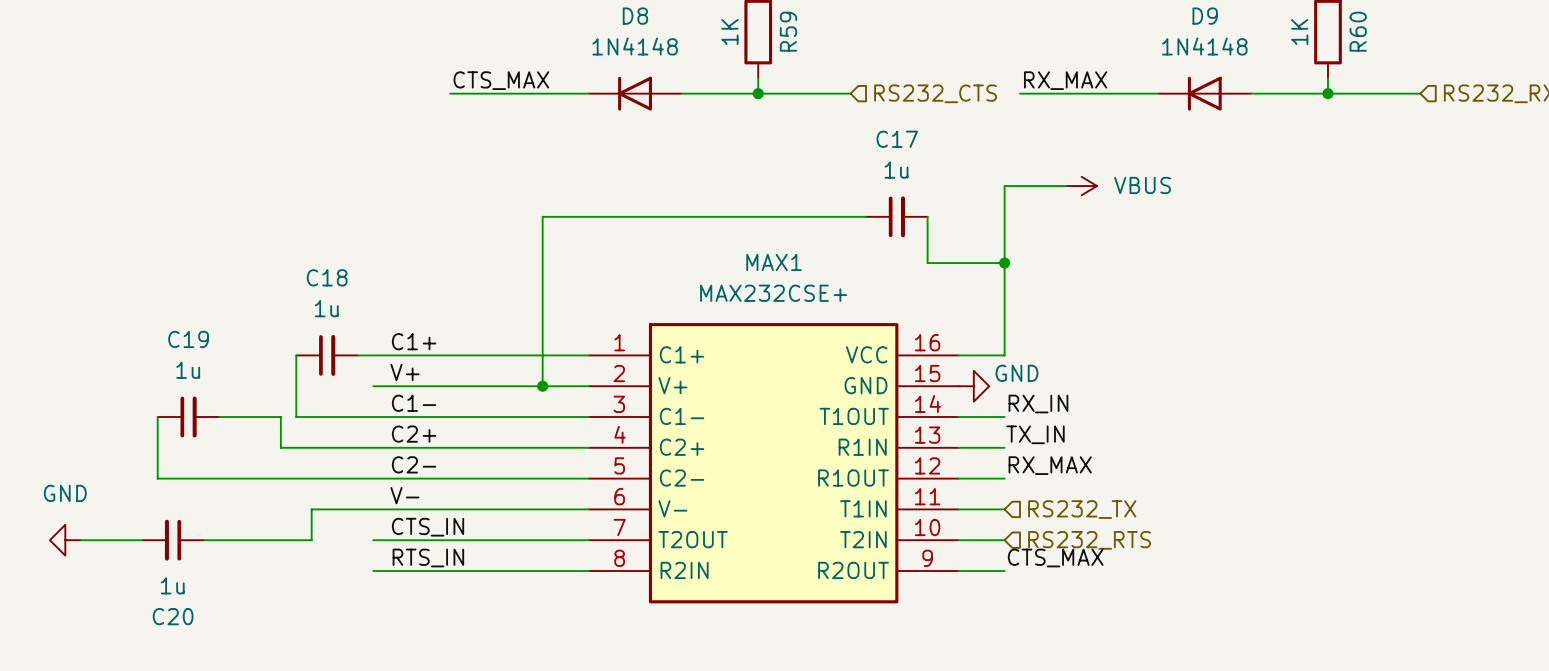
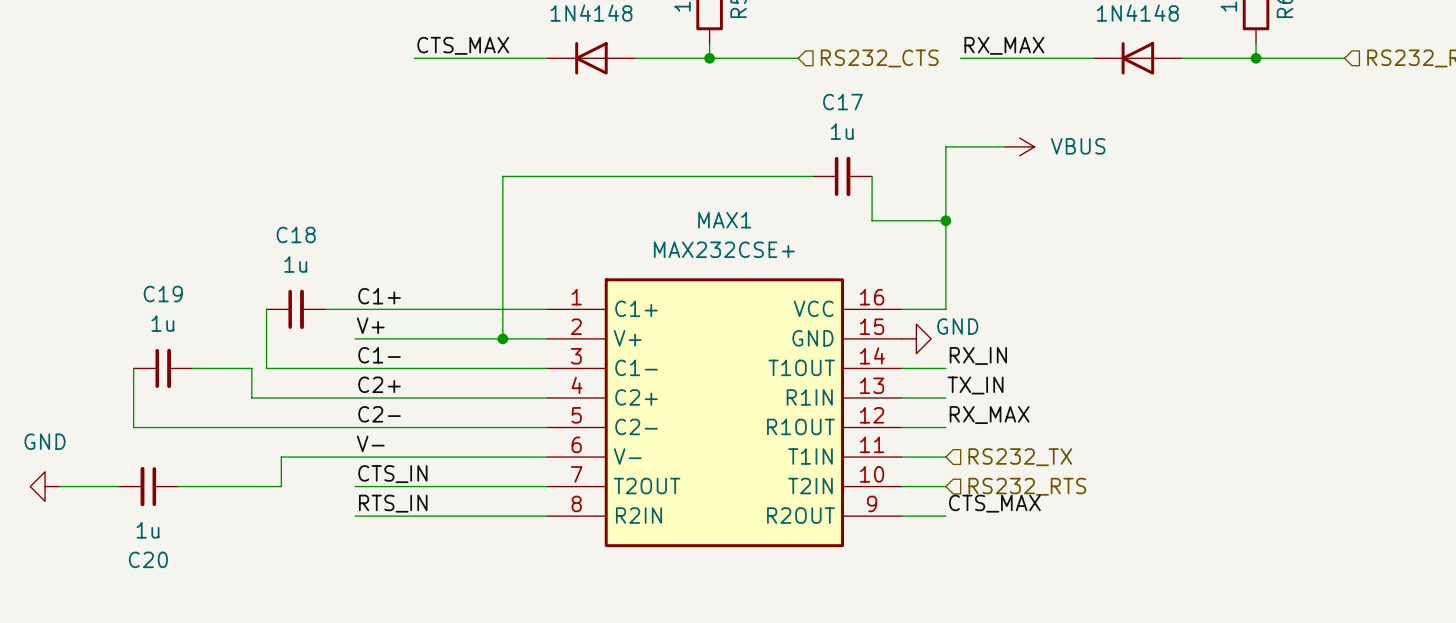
wire: (373, 386) (388, 386) -> none
wire: (373, 540) (388, 540) -> none
wire: (373, 571) (388, 571) -> none

